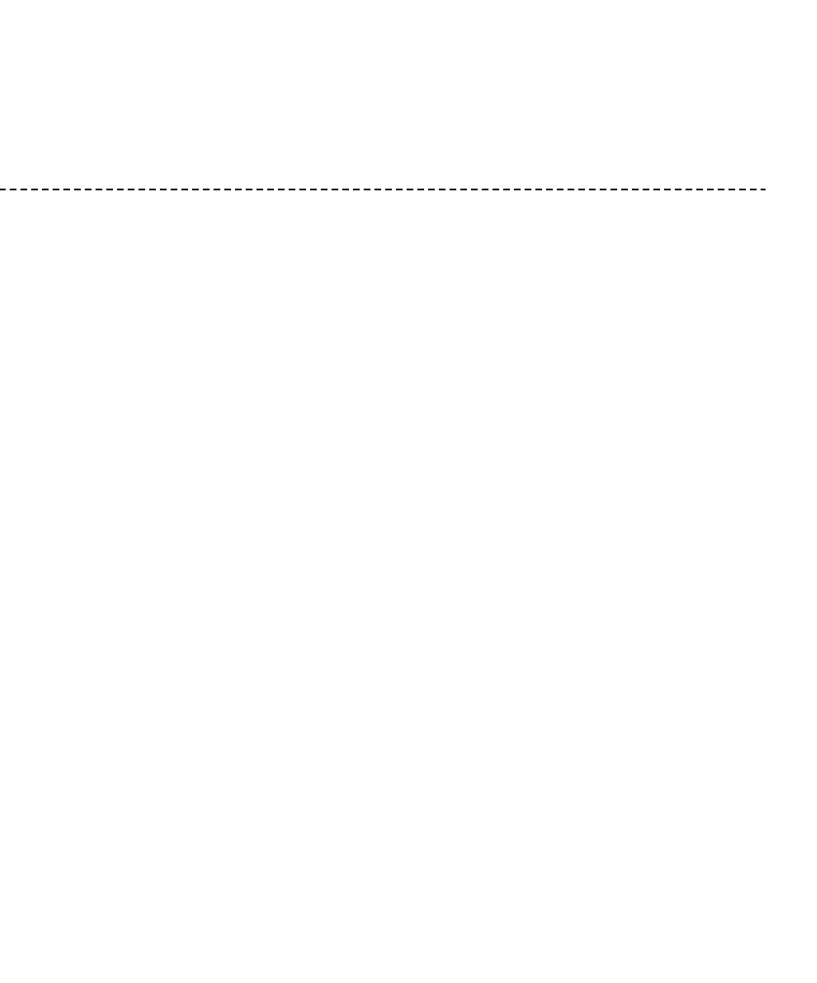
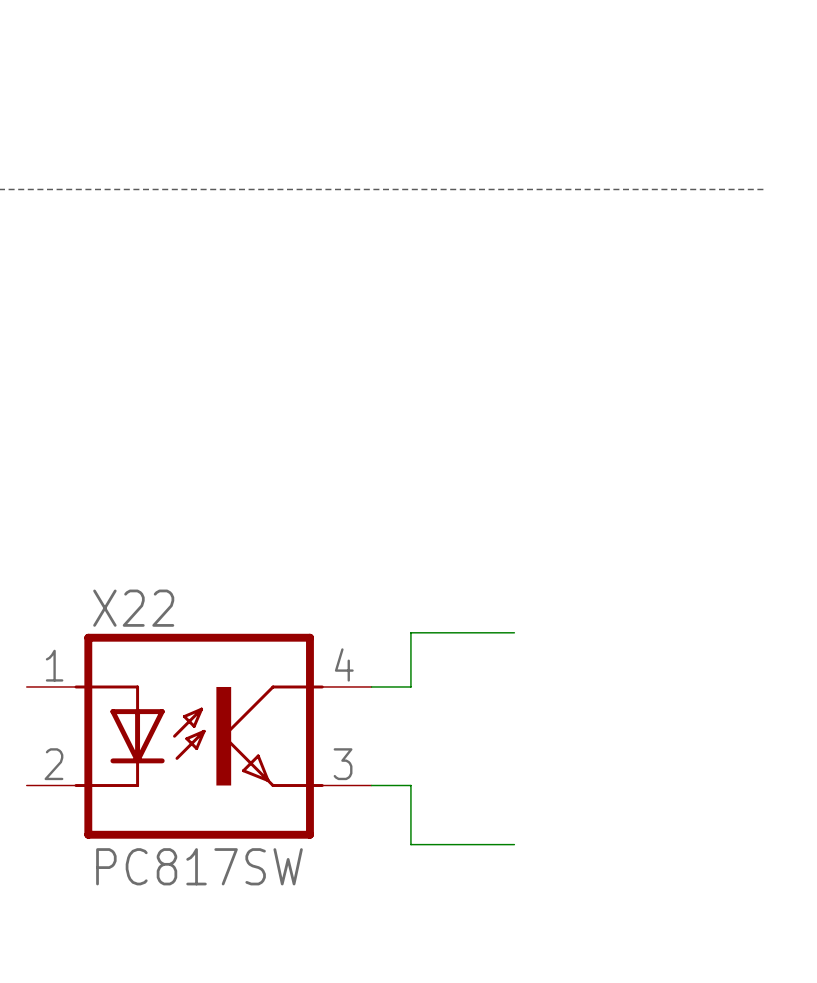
wire: none -> (514, 632) (410, 632) (410, 686) (371, 686)
X22: none -> PC817SW (199, 736)
wire: none -> (371, 785) (410, 785) (410, 844) (514, 844)

